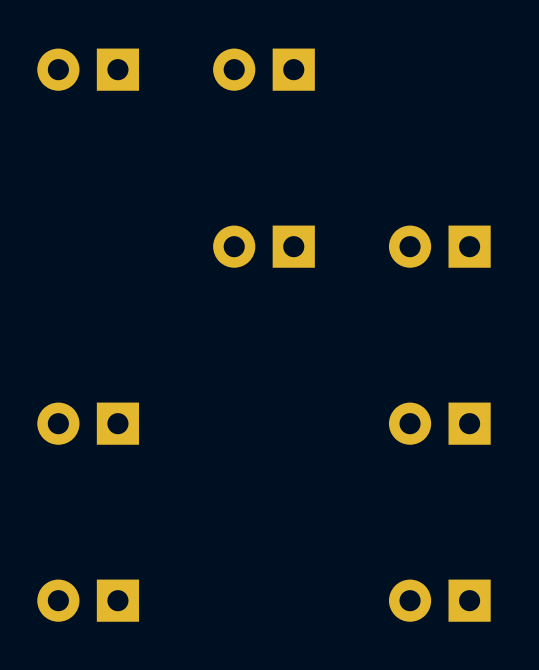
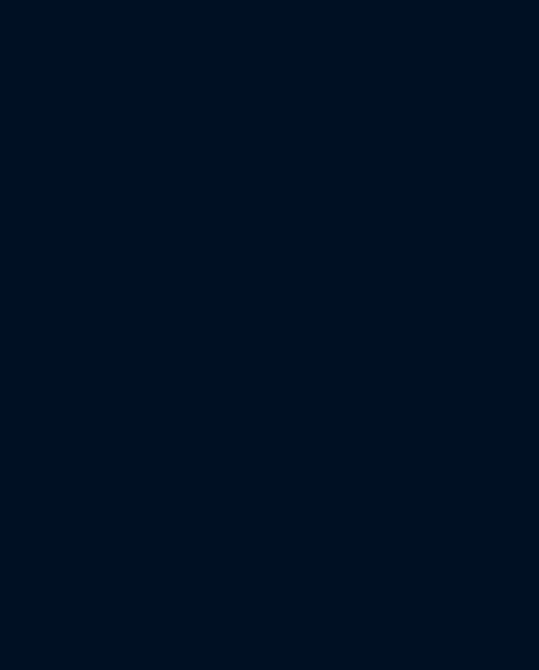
part: (88, 69) -> none
part: (263, 69) -> none
part: (263, 246) -> none
part: (439, 246) -> none
part: (88, 423) -> none
part: (439, 423) -> none
part: (88, 600) -> none
part: (439, 600) -> none

